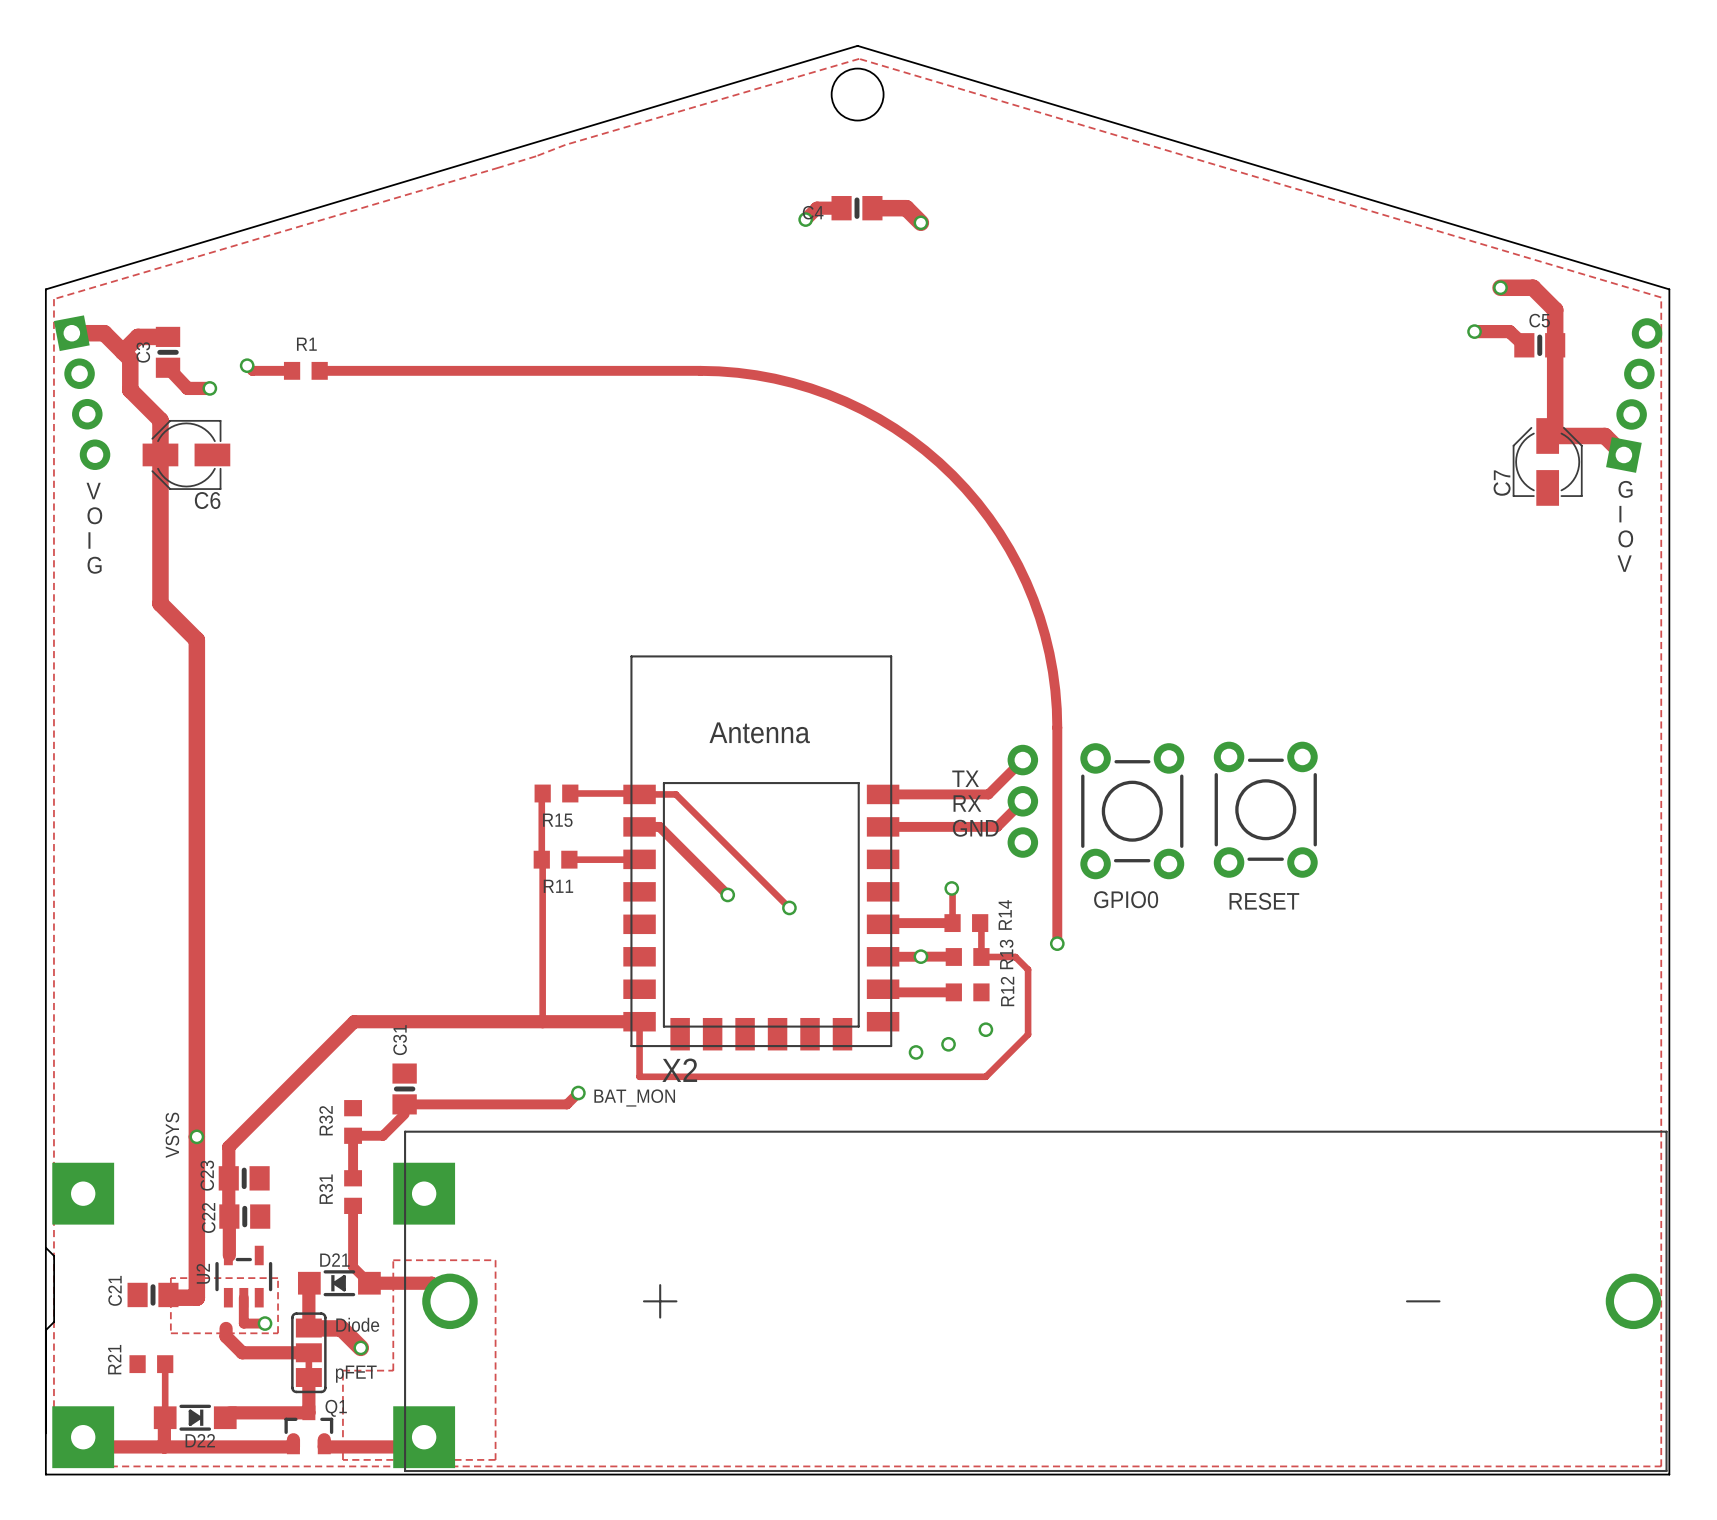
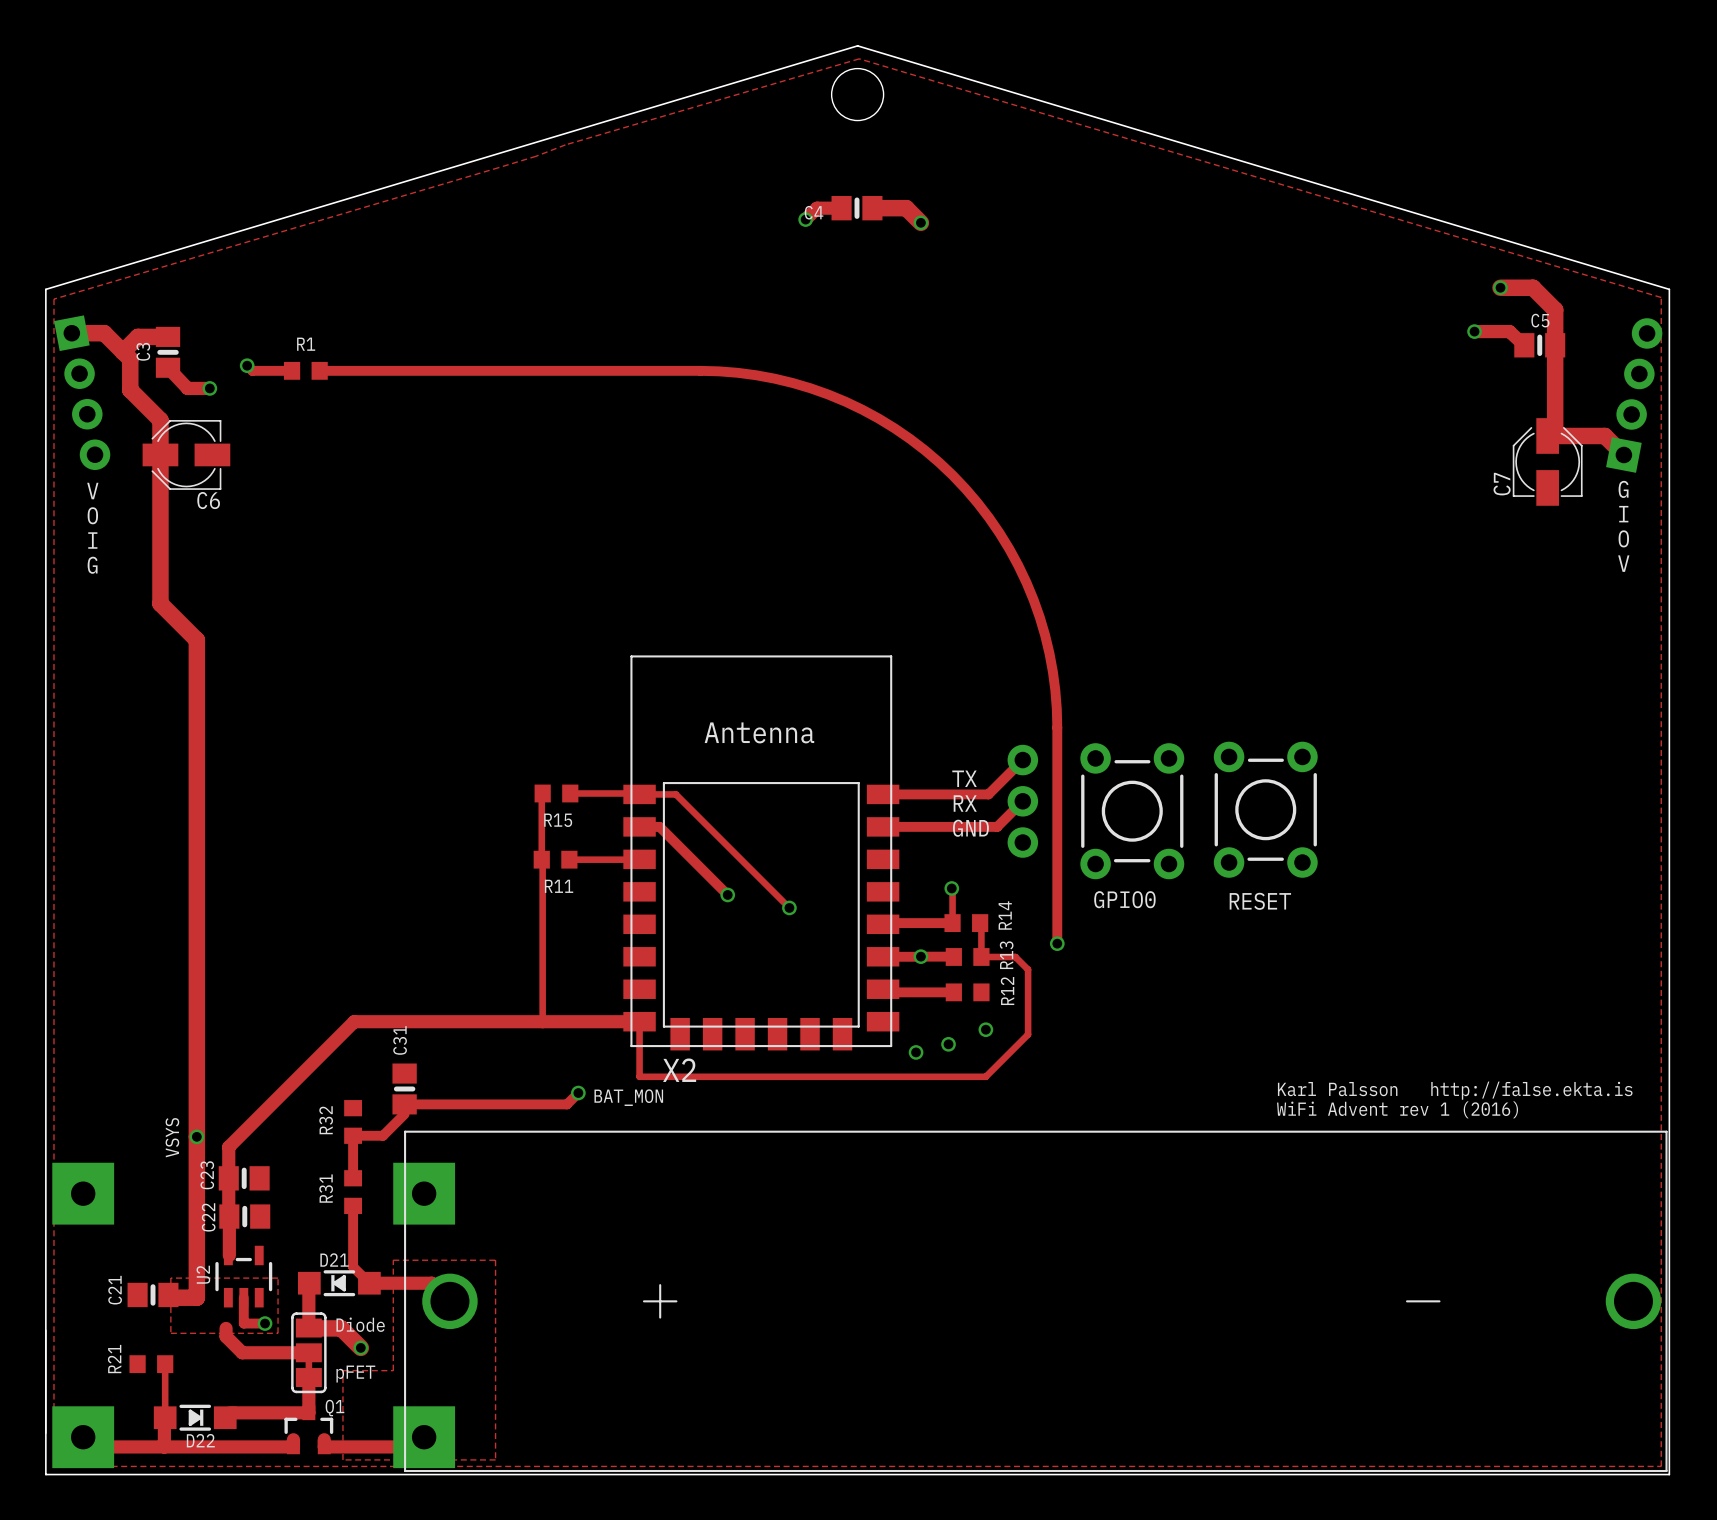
text: none -> Karl Palsson http://false.ekta.is (1455, 1090)
text: none -> WiFi Advent rev 1 (2016) (1397, 1109)
board edge: (45, 1247) (54, 1255) (54, 1321) (45, 1330) -> none

